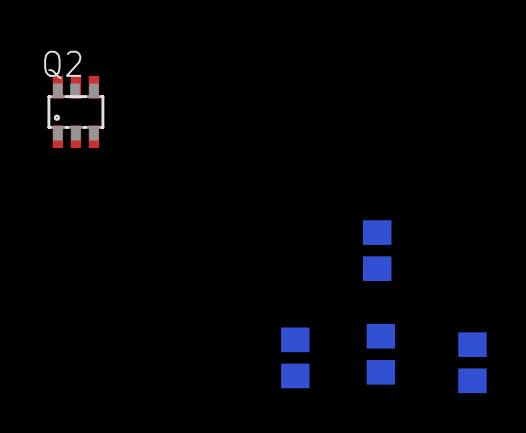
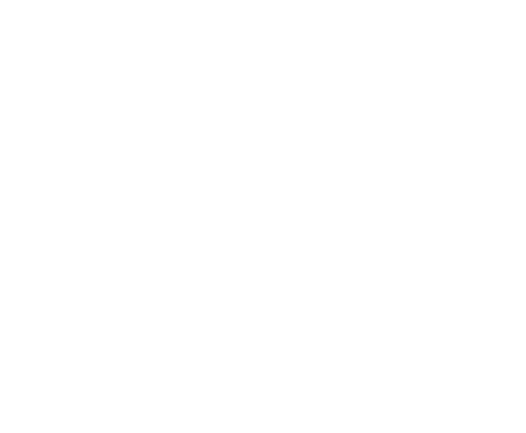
Q2: (75, 112) -> none
part: (377, 250) -> none
part: (380, 354) -> none
part: (295, 357) -> none
part: (472, 362) -> none

